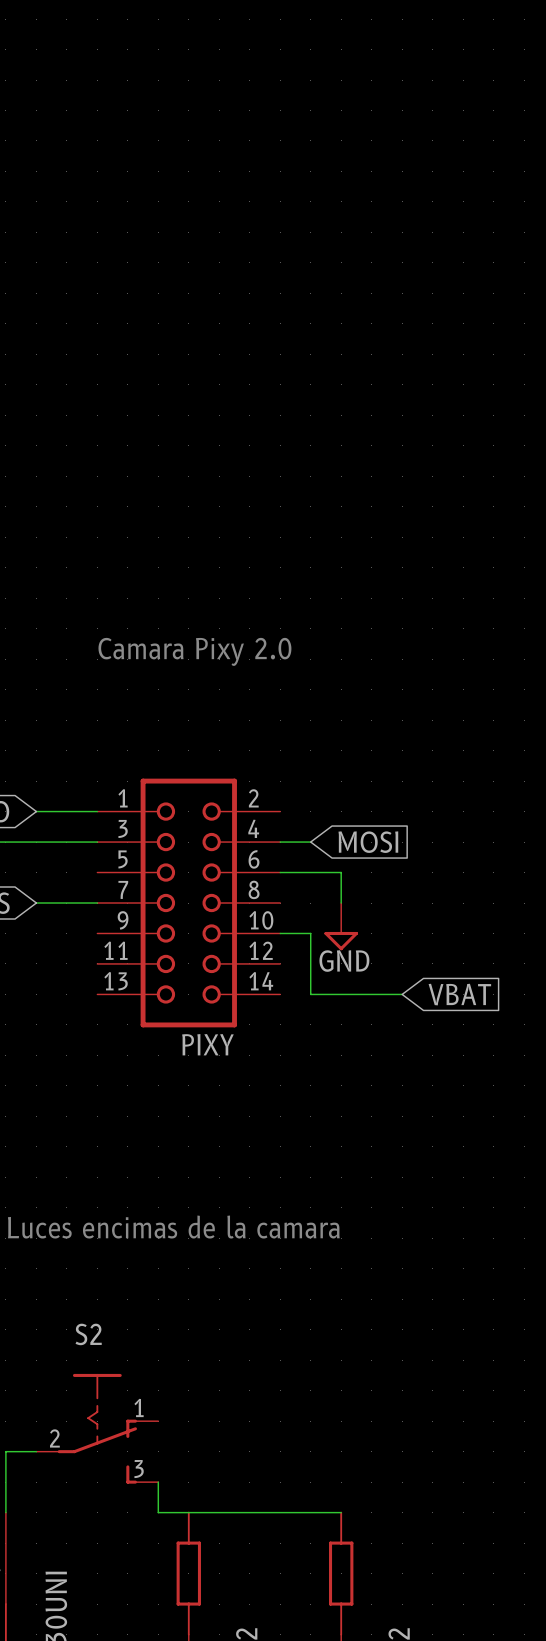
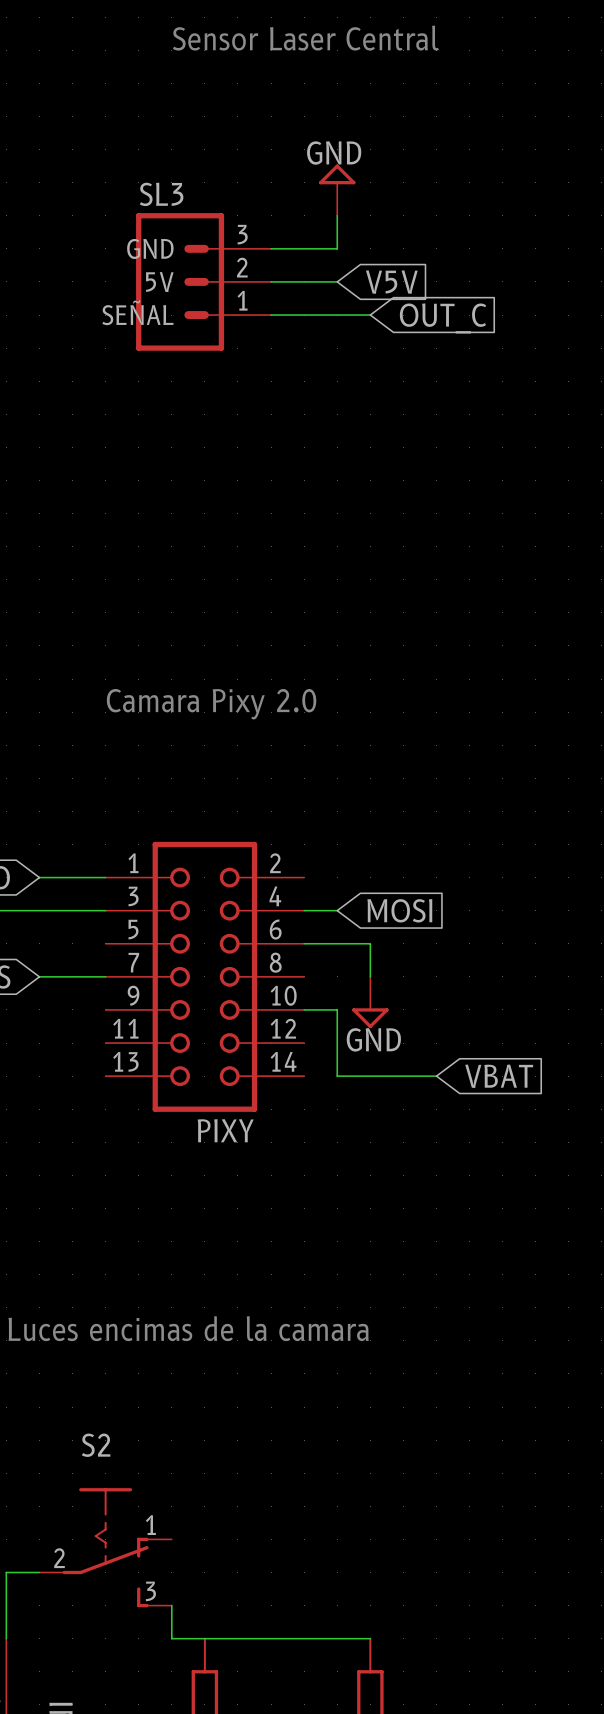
text: none -> Sensor Laser Central (305, 38)
power symbol: none -> GND (337, 190)
wire: none -> (337, 215) (337, 248) (271, 248)
SL3: none -> (203, 281)
wire: none -> (271, 281) (337, 281)
global label: none -> V5V (391, 282)
wire: none -> (271, 315) (370, 315)
global label: none -> OUT_C (443, 318)

